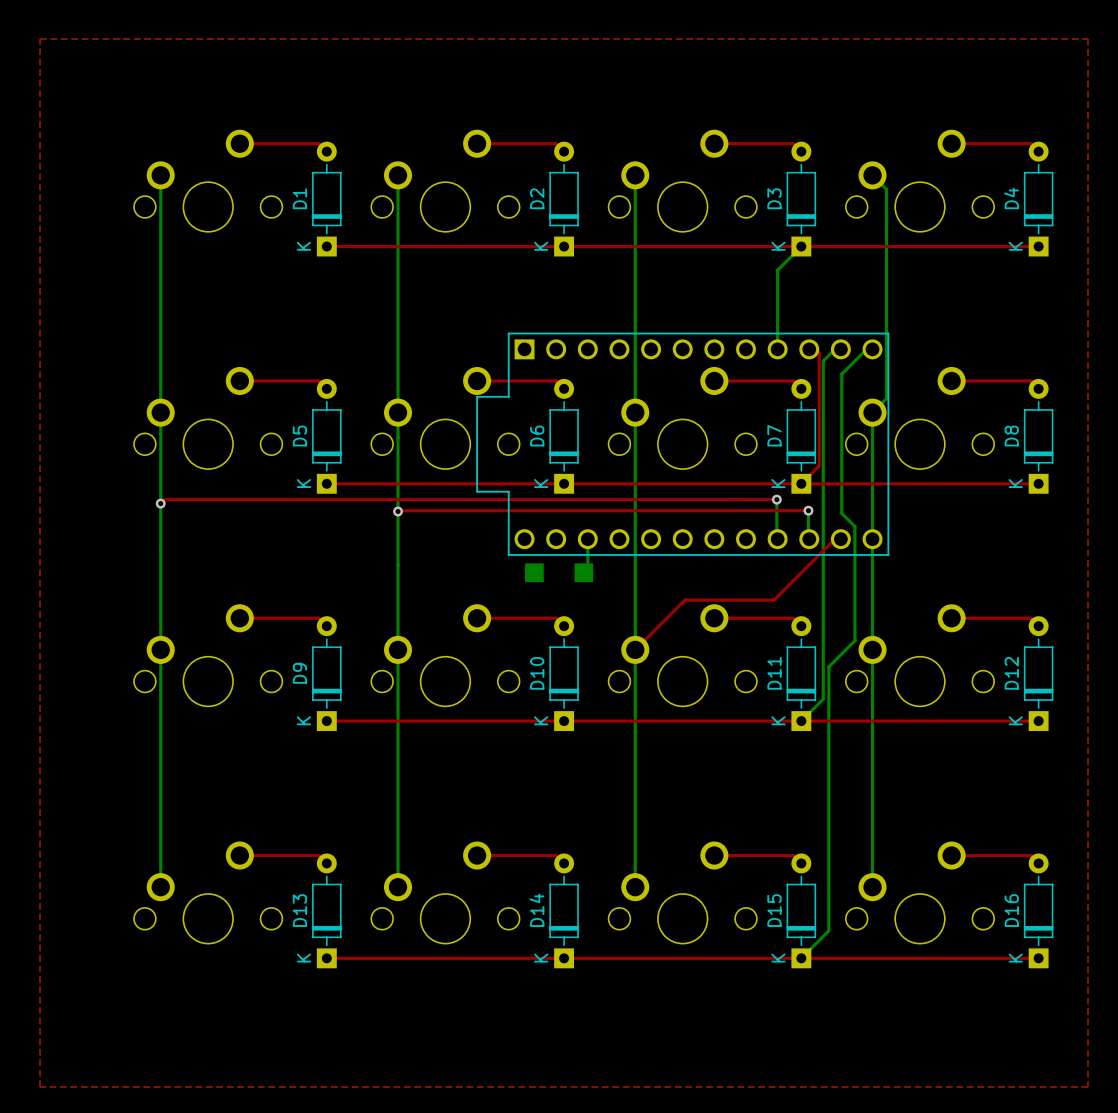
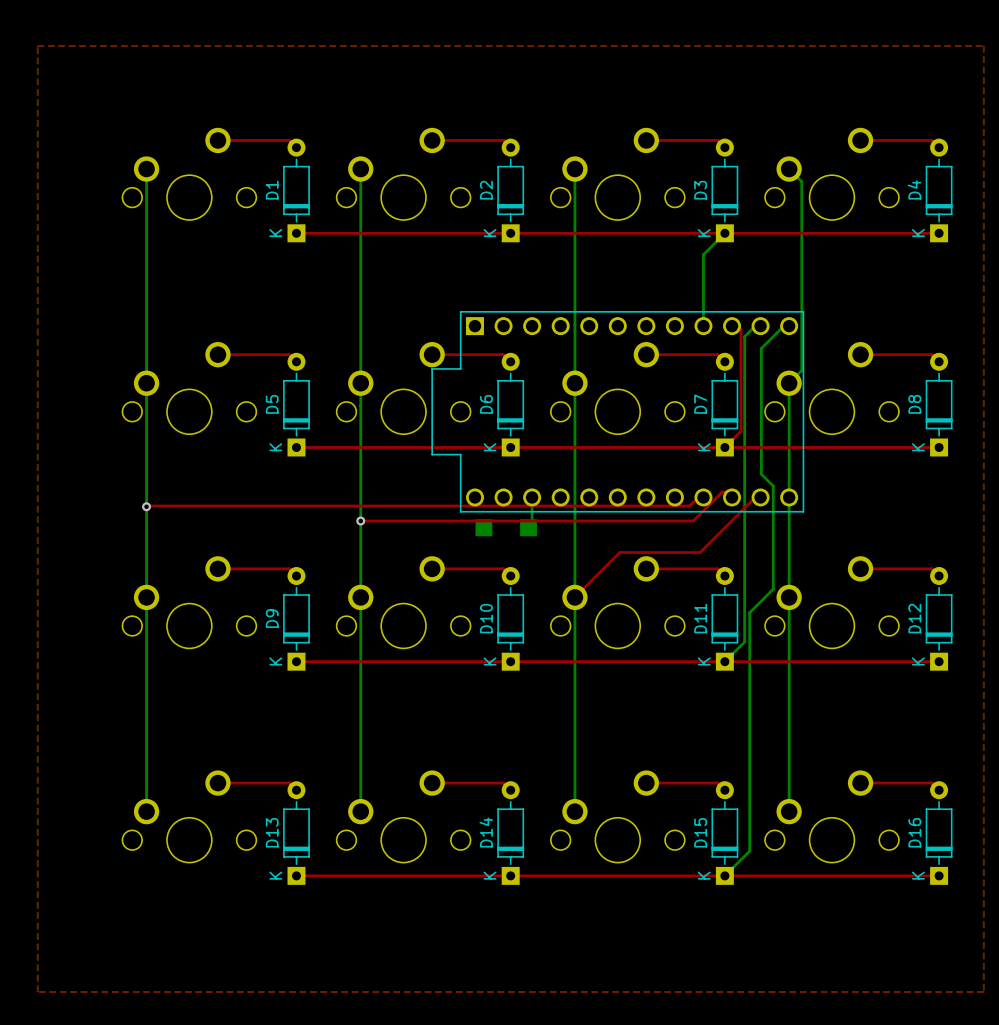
top track: (776, 499) (164, 499) (160, 503) -> none
bottom track: (776, 499) (777, 539) -> none
via: (776, 499) -> none
via position: (160, 503) -> (146, 506)
top track: (808, 510) (398, 511) -> none
bottom track: (808, 510) (809, 539) -> none
via: (808, 510) -> none
via position: (398, 511) -> (360, 521)
top track: none -> (703, 492) (689, 506) (146, 506)
top track: none -> (732, 492) (722, 492) (693, 521) (360, 521)

